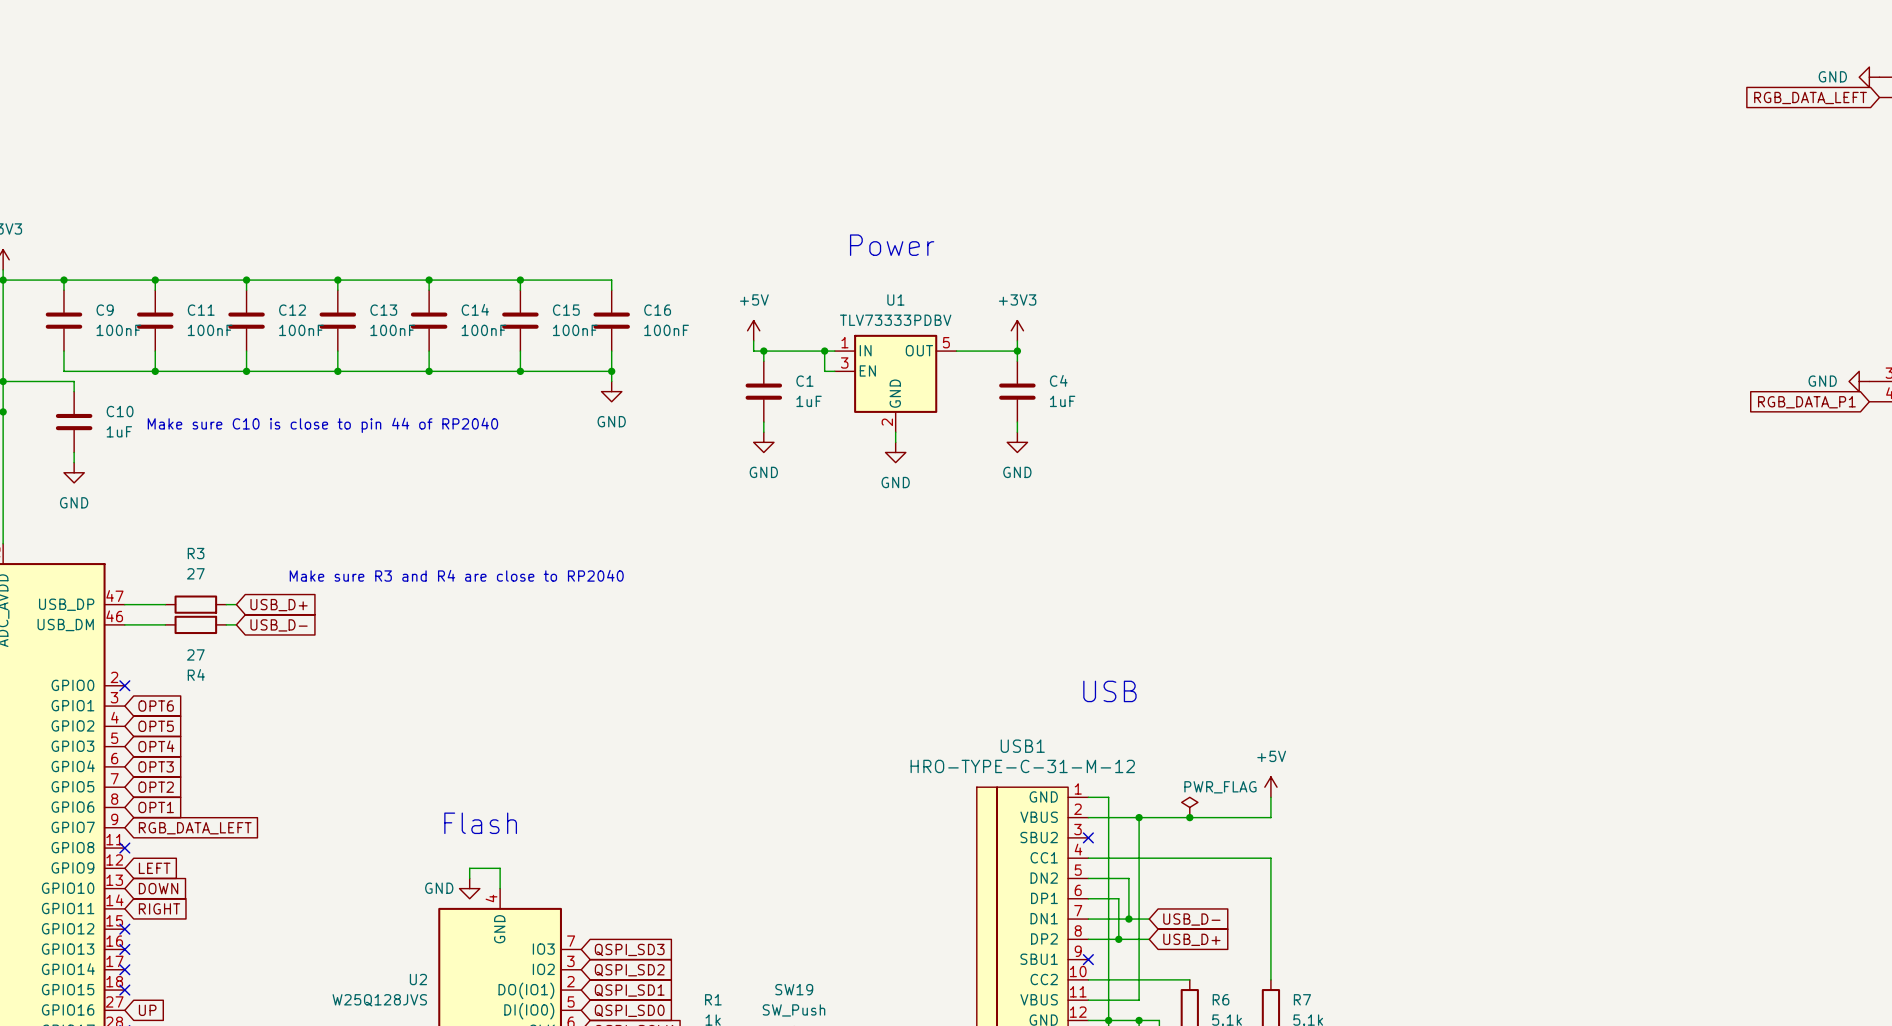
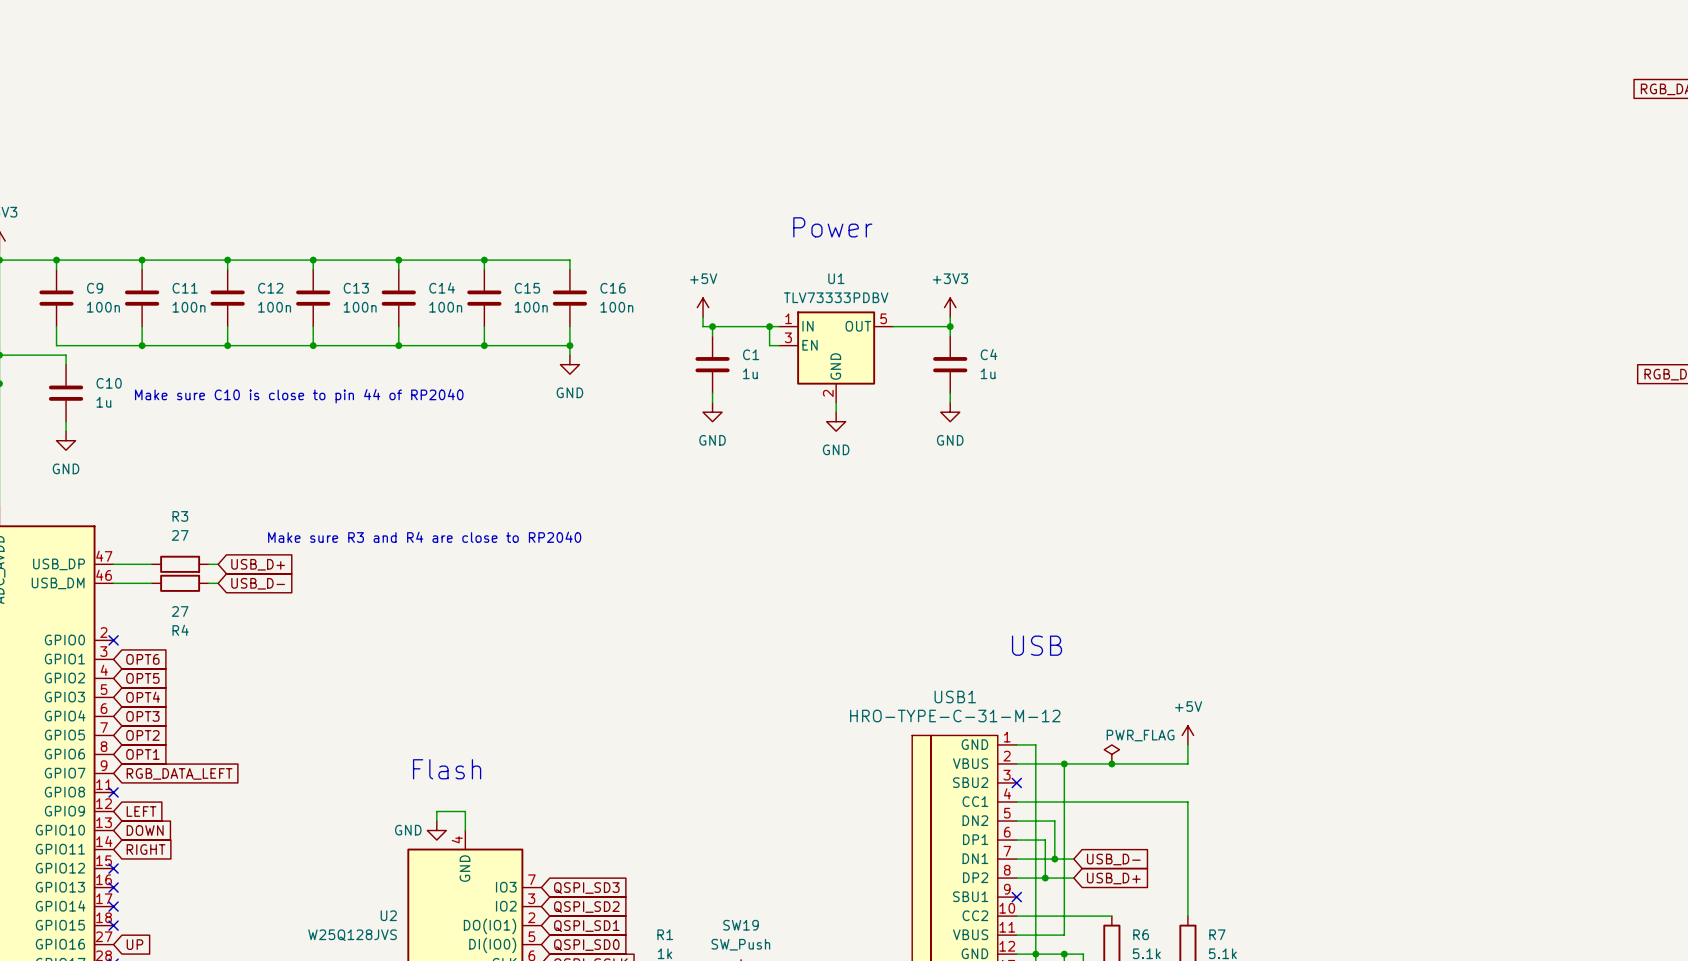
C9 value: 100nF (118, 330) -> 100n (103, 307)
C11 value: 100nF (210, 330) -> 100n (189, 307)
C12 value: 100nF (301, 330) -> 100n (274, 307)
C13 value: 100nF (392, 330) -> 100n (360, 307)
C14 value: 100nF (484, 330) -> 100n (445, 307)
C15 value: 100nF (575, 330) -> 100n (531, 307)
C16 value: 100nF (666, 330) -> 100n (616, 307)
C1 value: 1uF (809, 401) -> 1u (750, 373)
C4 value: 1uF (1062, 401) -> 1u (988, 373)
C10 value: 1uF (119, 431) -> 1u (103, 402)

